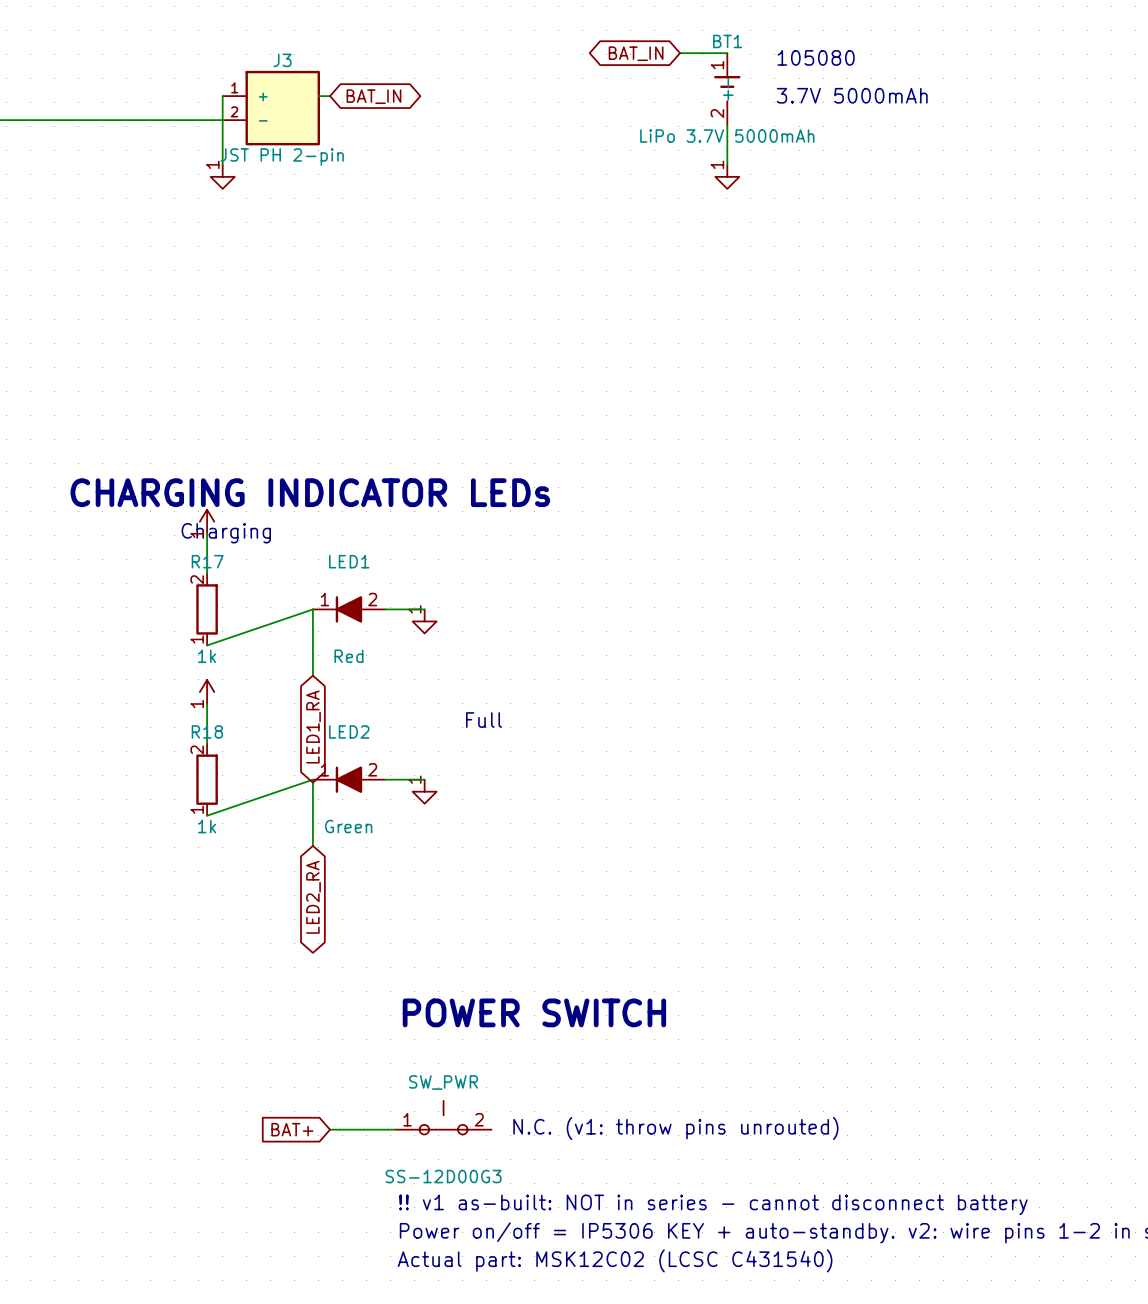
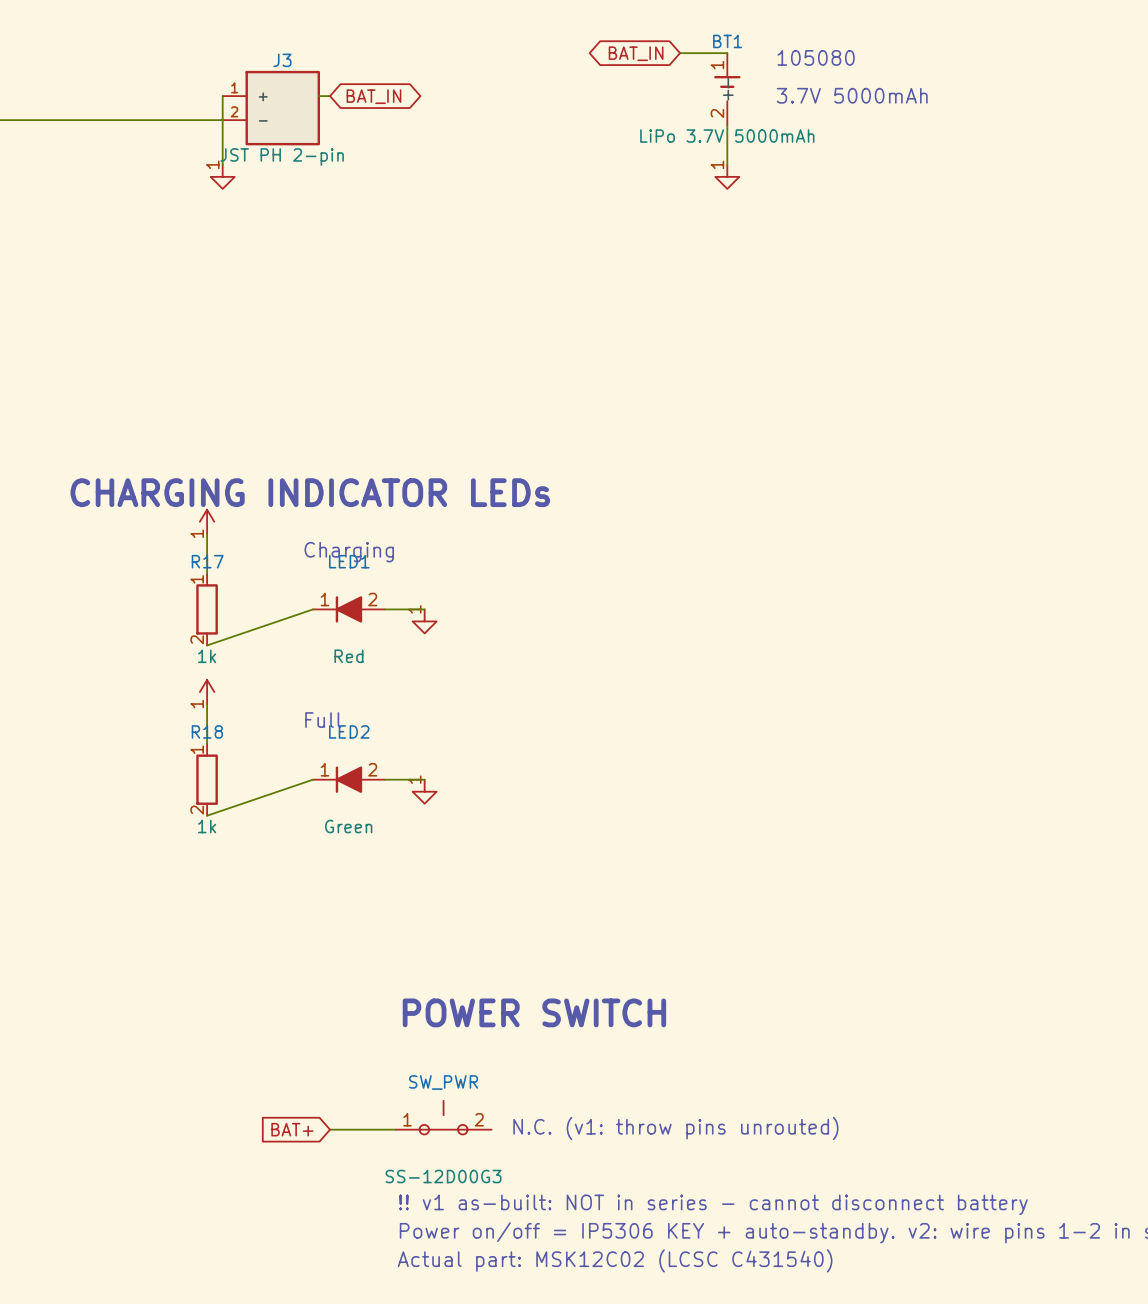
text position: Charging (226, 533) -> Charging (349, 552)
R17 rotation: 0° (207, 609) -> 180° (207, 609)
wire: (312, 609) (312, 675) -> none
text position: Full (484, 720) -> Full (323, 720)
global label: LED1_RA (313, 727) -> none
R18 rotation: 0° (207, 779) -> 180° (207, 779)
wire: (312, 779) (312, 845) -> none
global label: LED2_RA (313, 897) -> none

